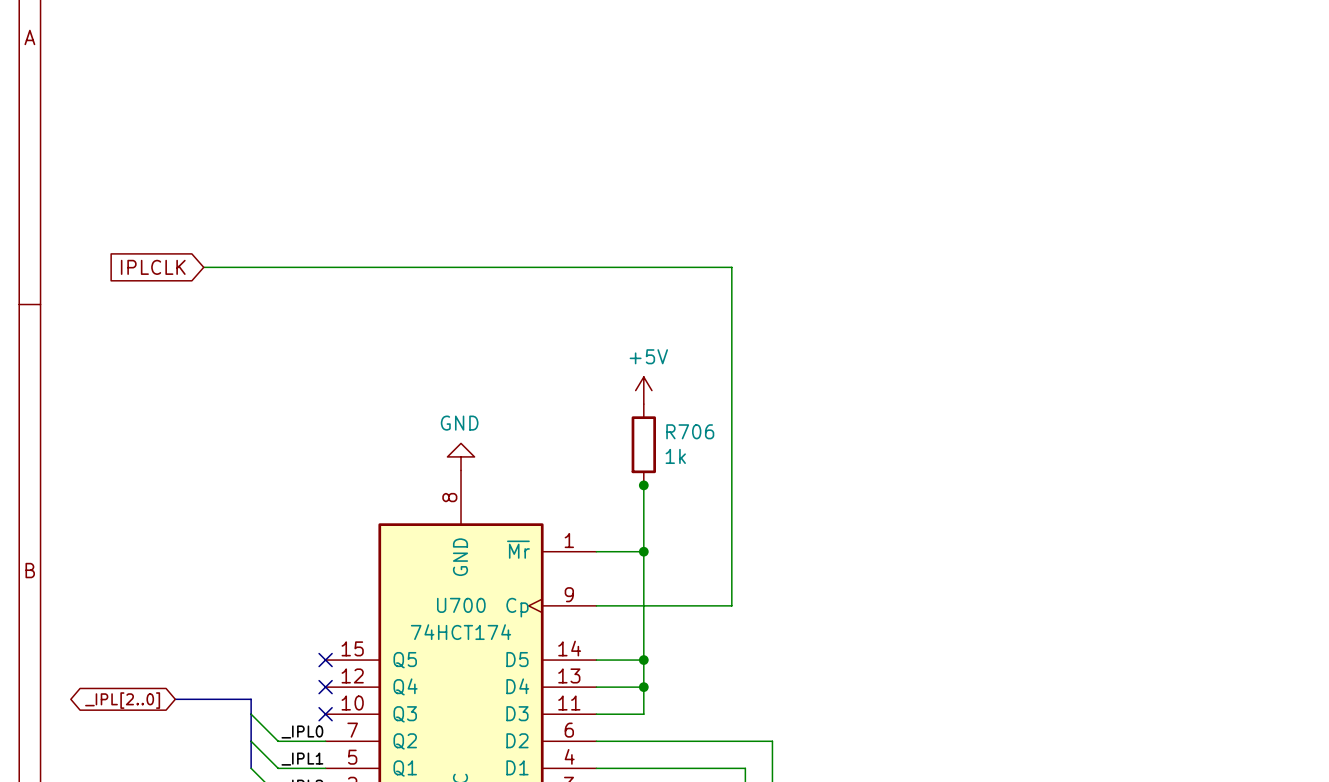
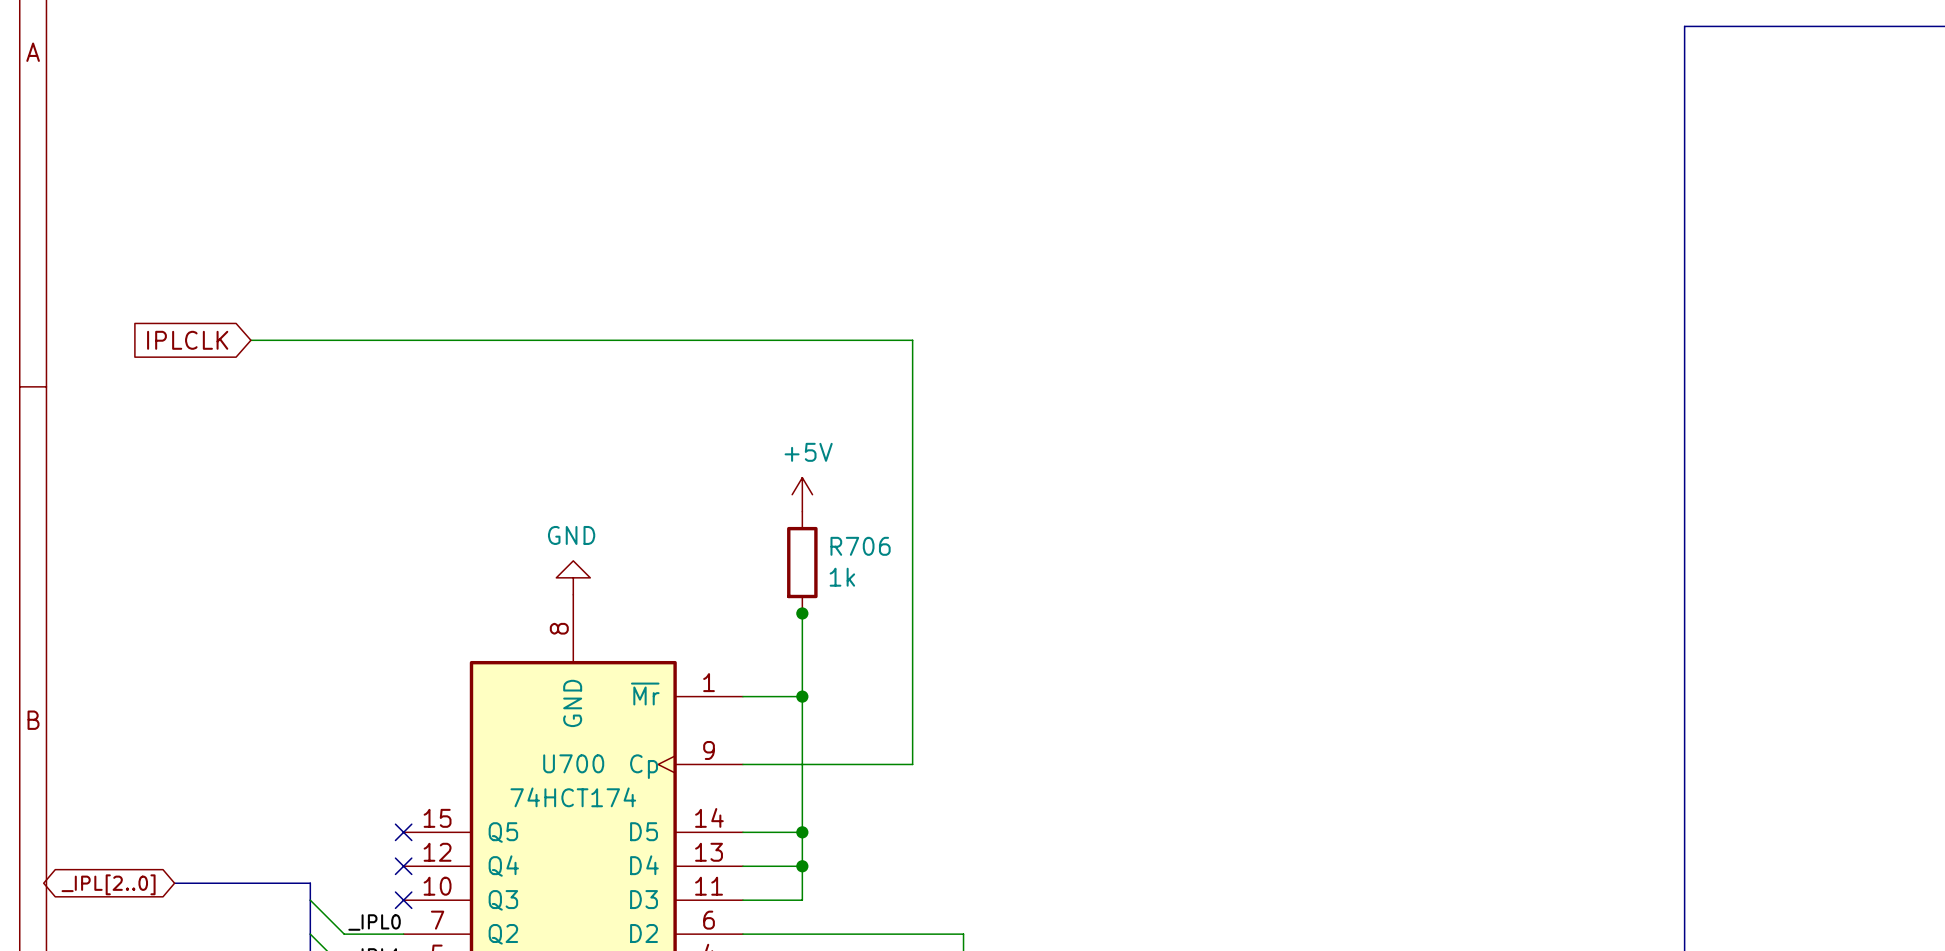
bus: (175, 699) (251, 700) -> (174, 883) (310, 883)
global label position: _IPL[2..0] (122, 700) -> _IPL[2..0] (108, 884)

